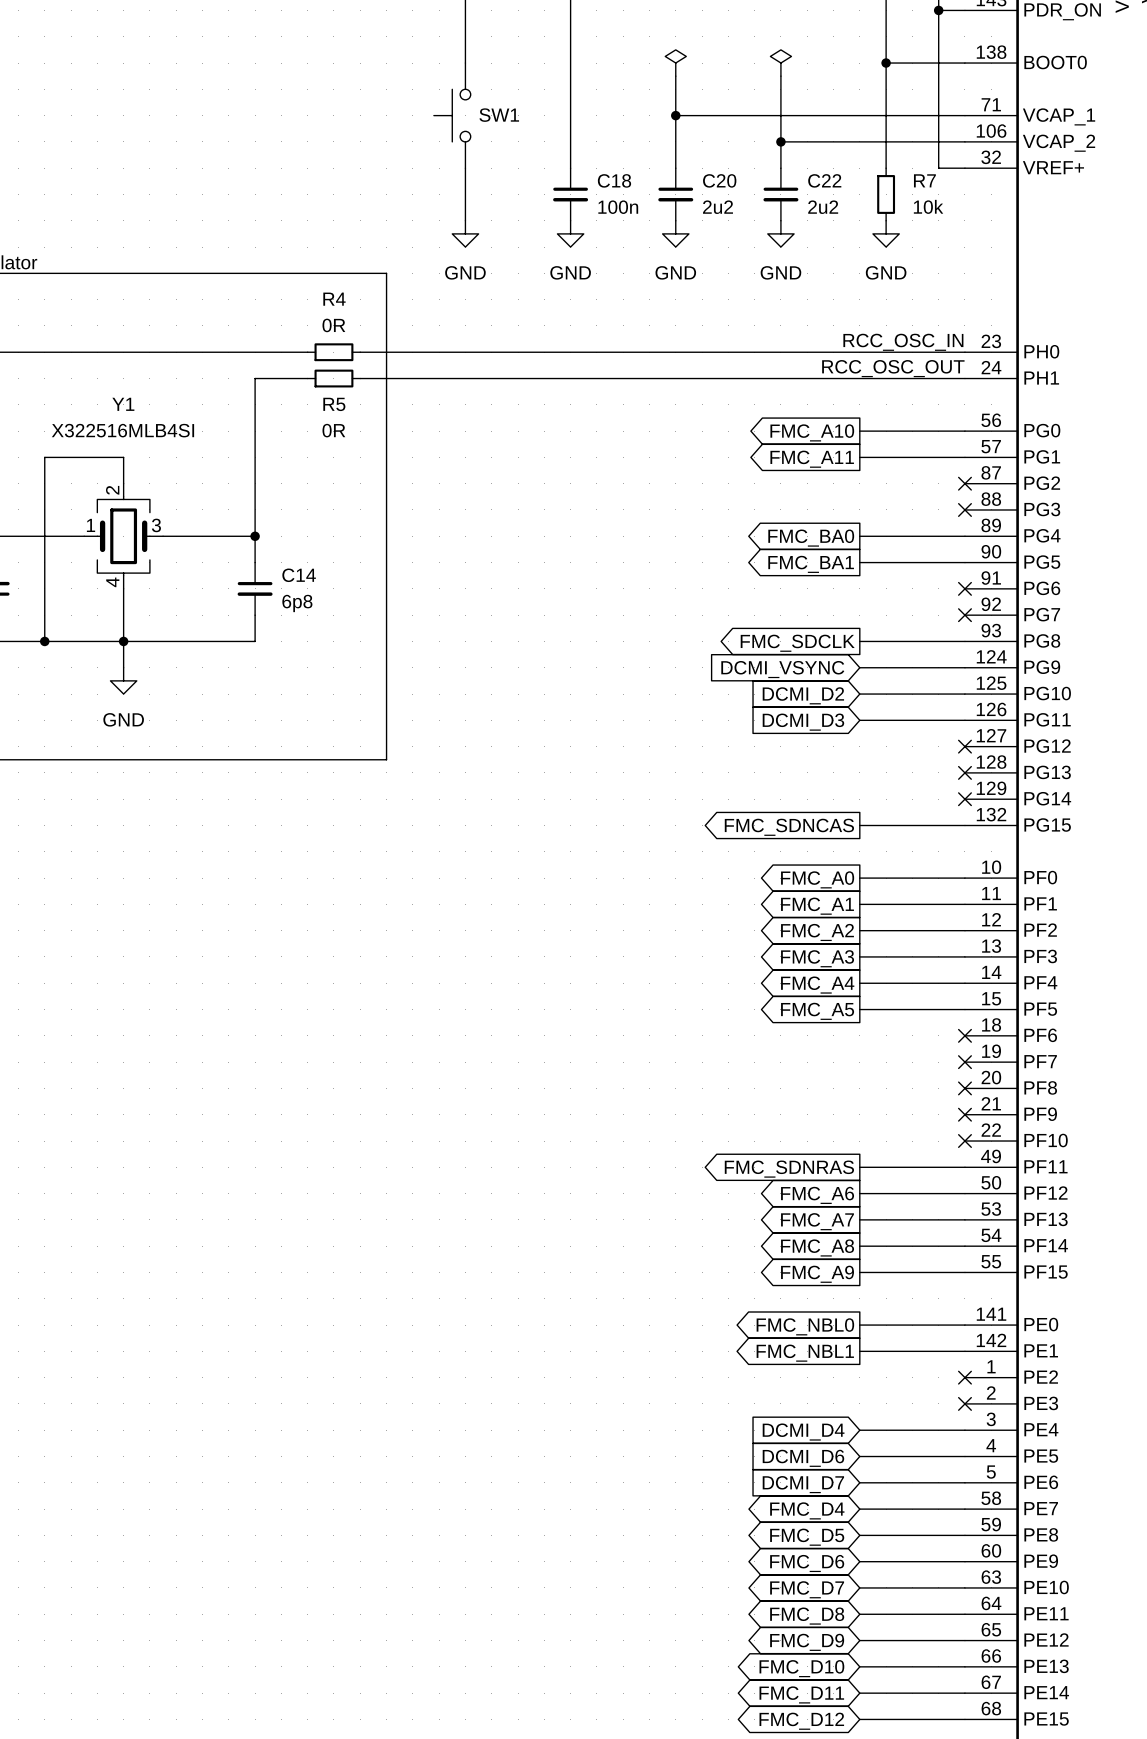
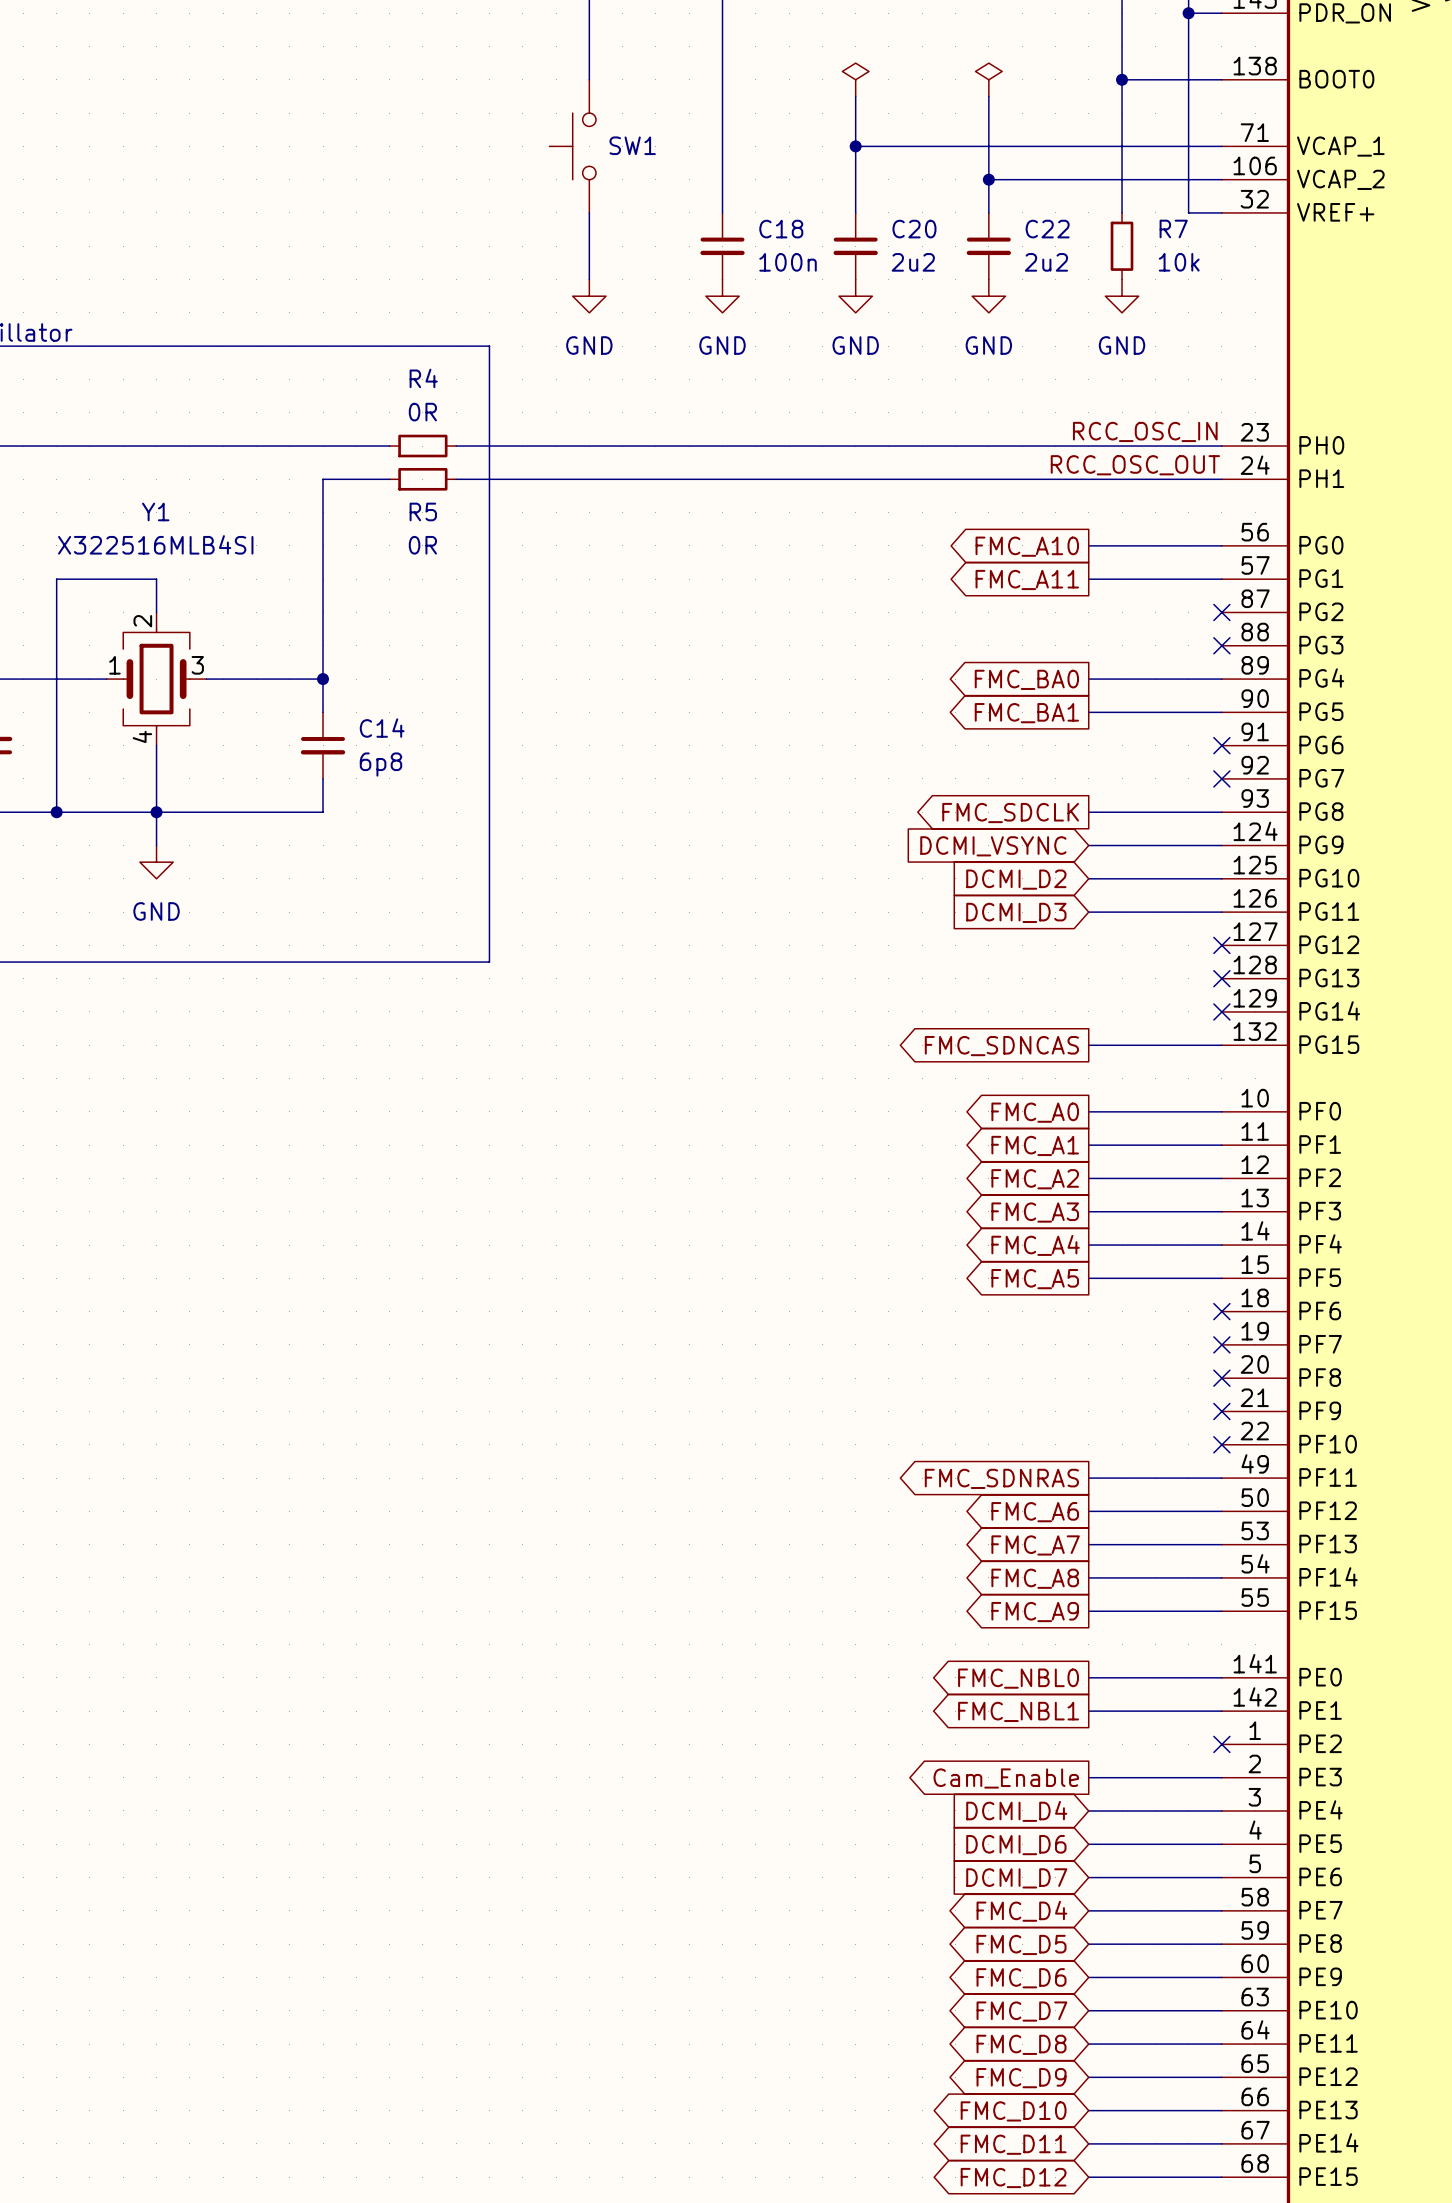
wire: none -> (1088, 1777) (1221, 1777)
no-connect mark: (964, 1403) -> none
global label: none -> Cam_Enable (1006, 1778)

